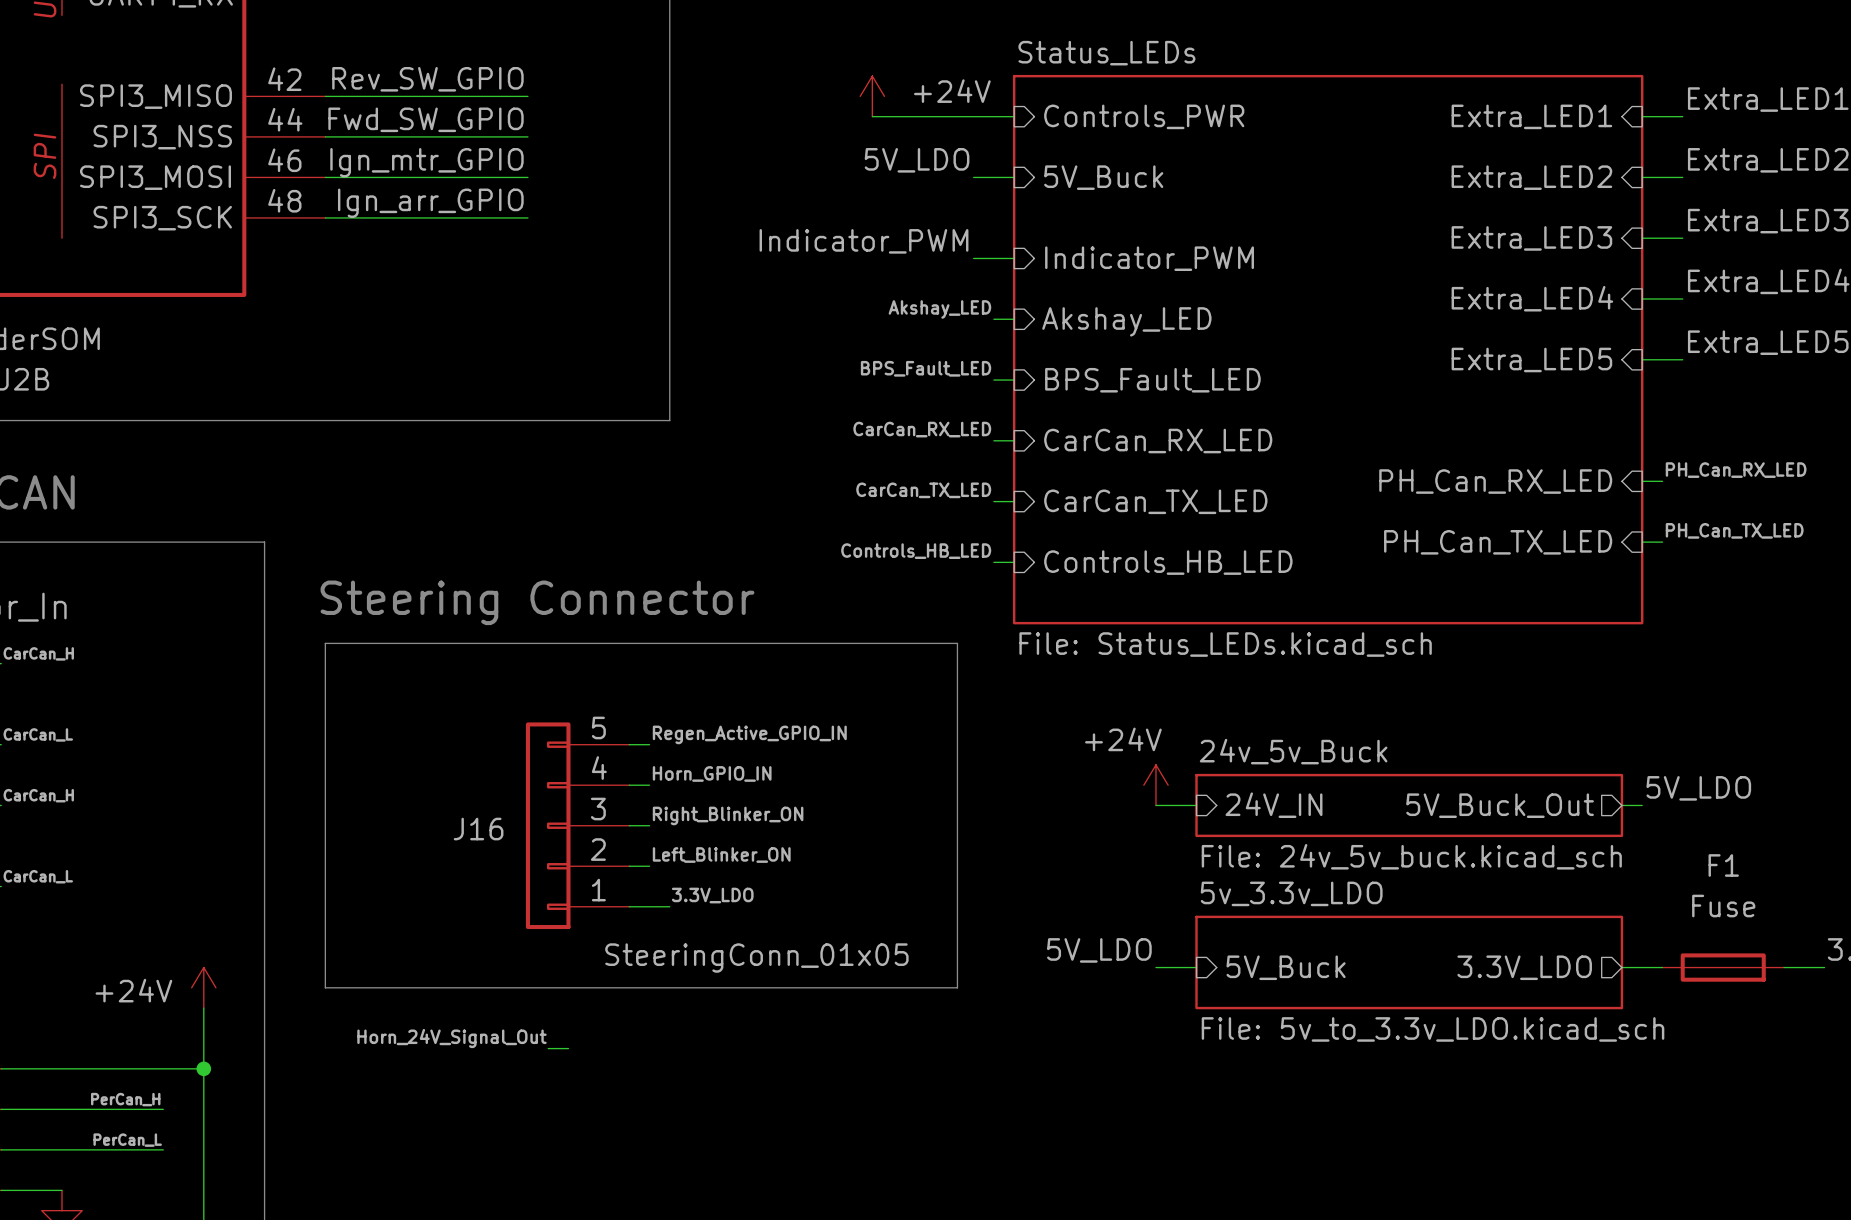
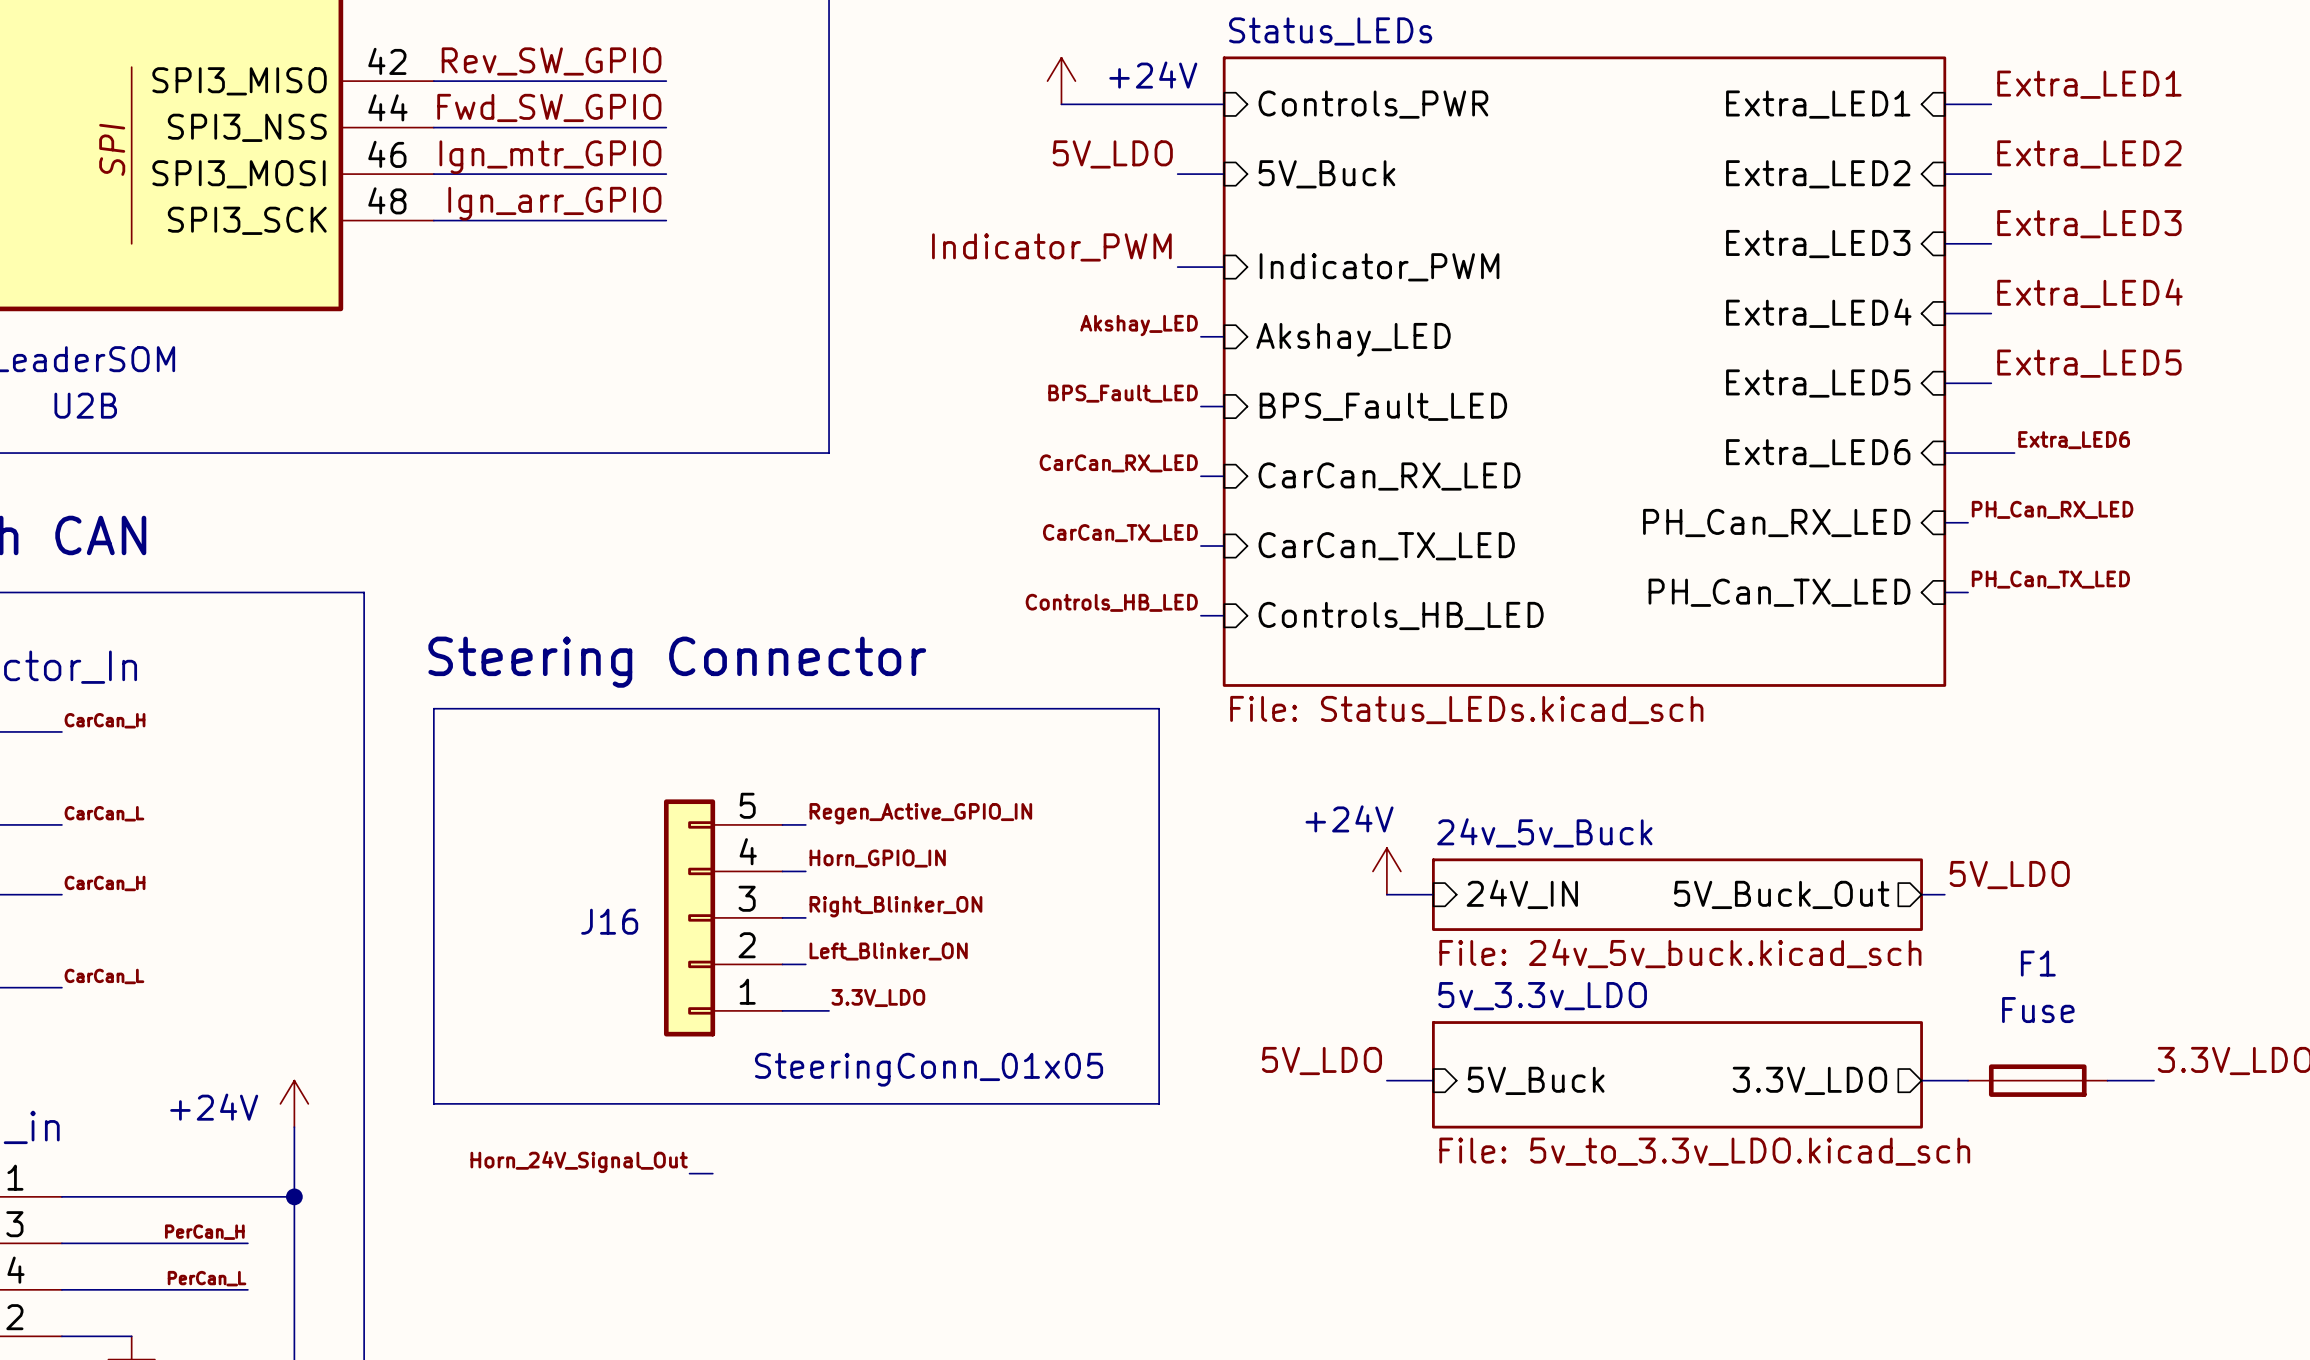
label: none -> Extra_LED6 (2074, 440)
sheet pin: none -> Extra_LED6 (1818, 453)
wire: none -> (1944, 453) (2014, 453)

